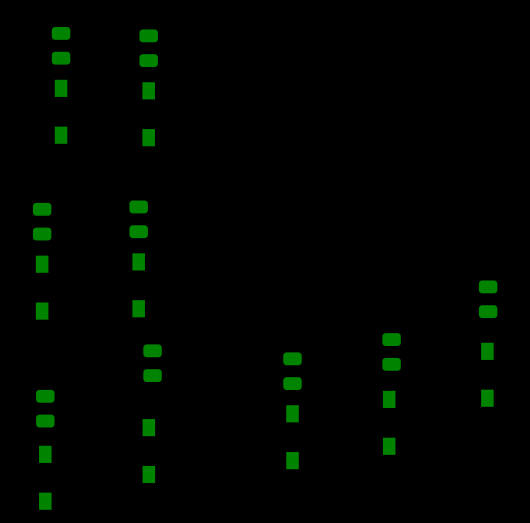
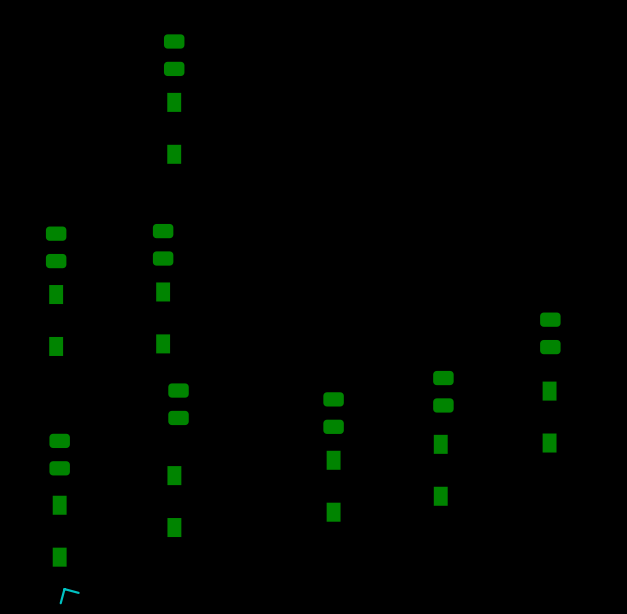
part: (61, 45) -> none
part: (61, 111) -> none

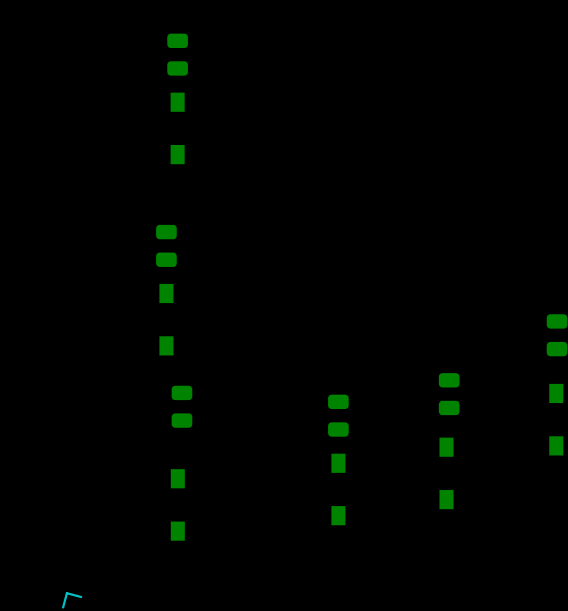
part: (56, 247) -> none
part: (56, 320) -> none
part: (59, 454) -> none
part: (59, 531) -> none

